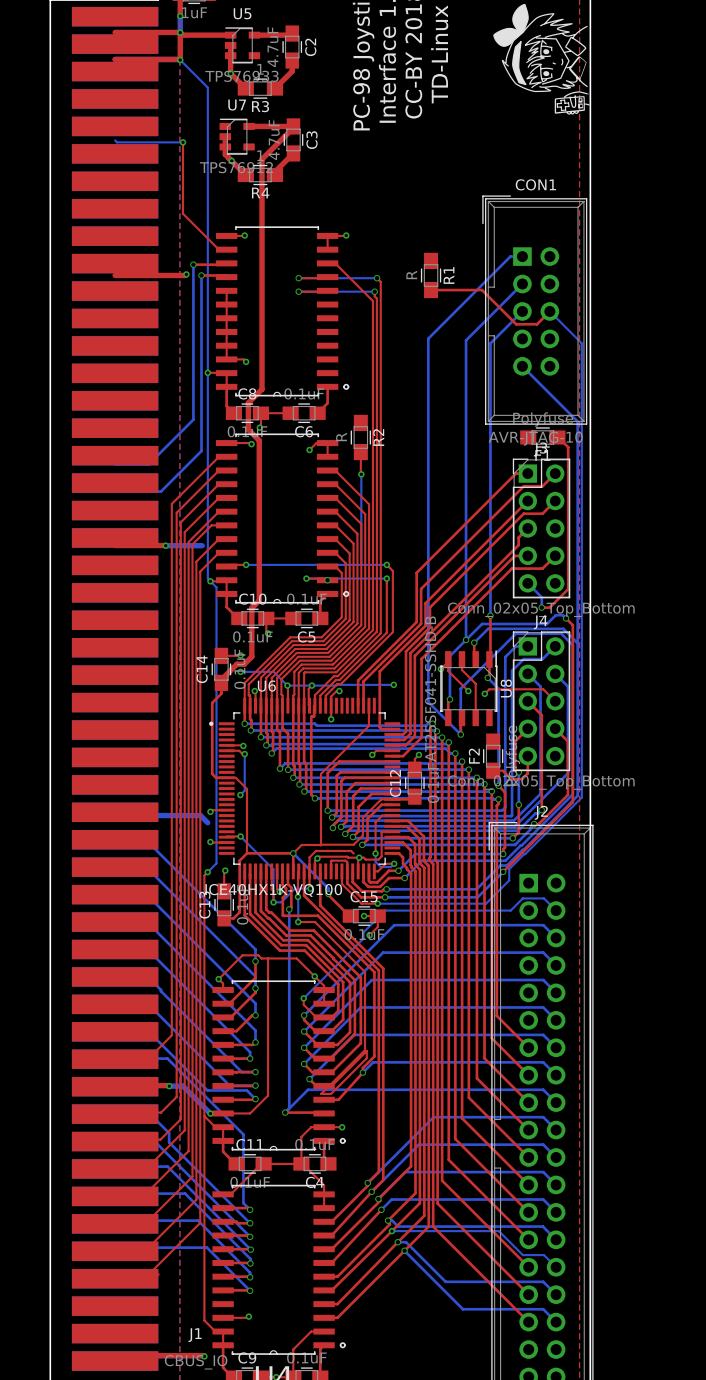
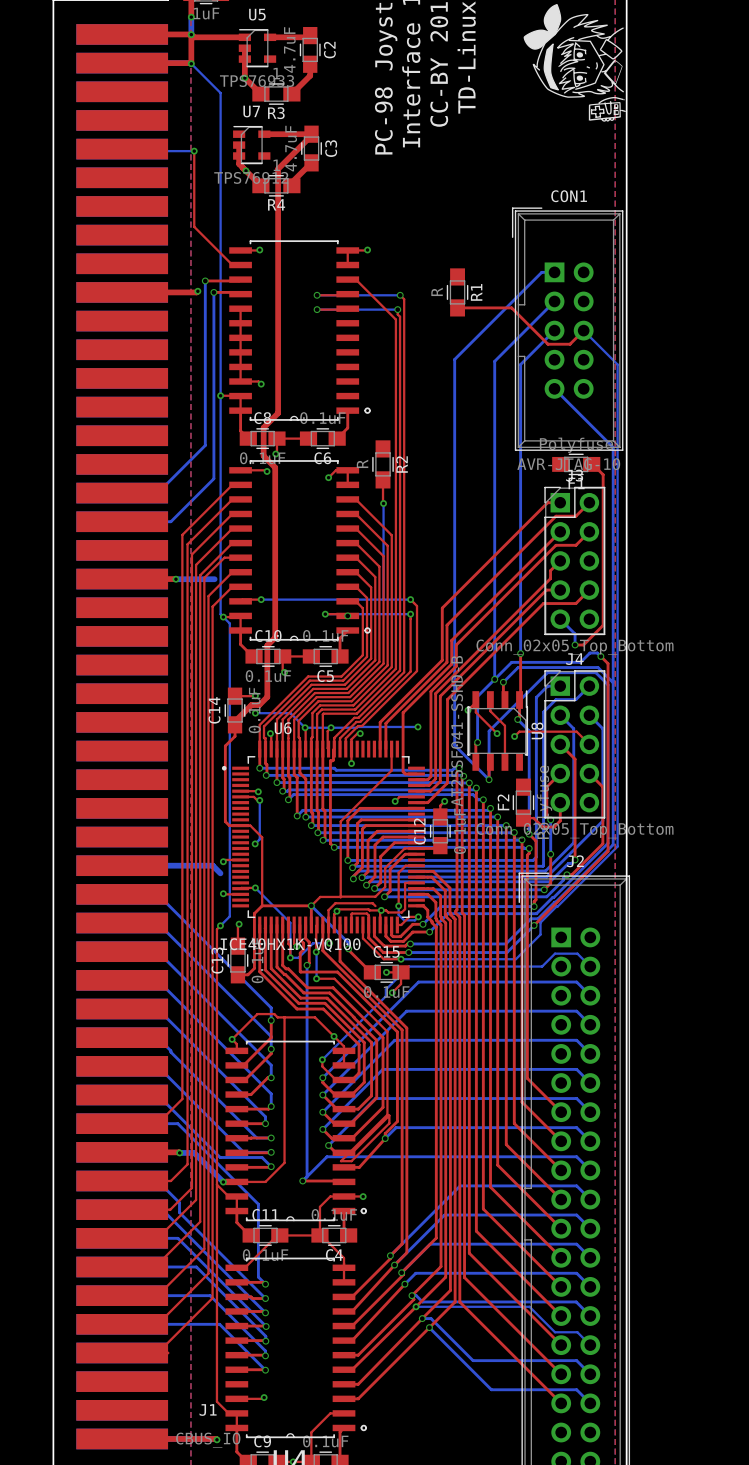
J1 footprint: [71, 6, 159, 1371] -> [76, 24, 169, 1450]

